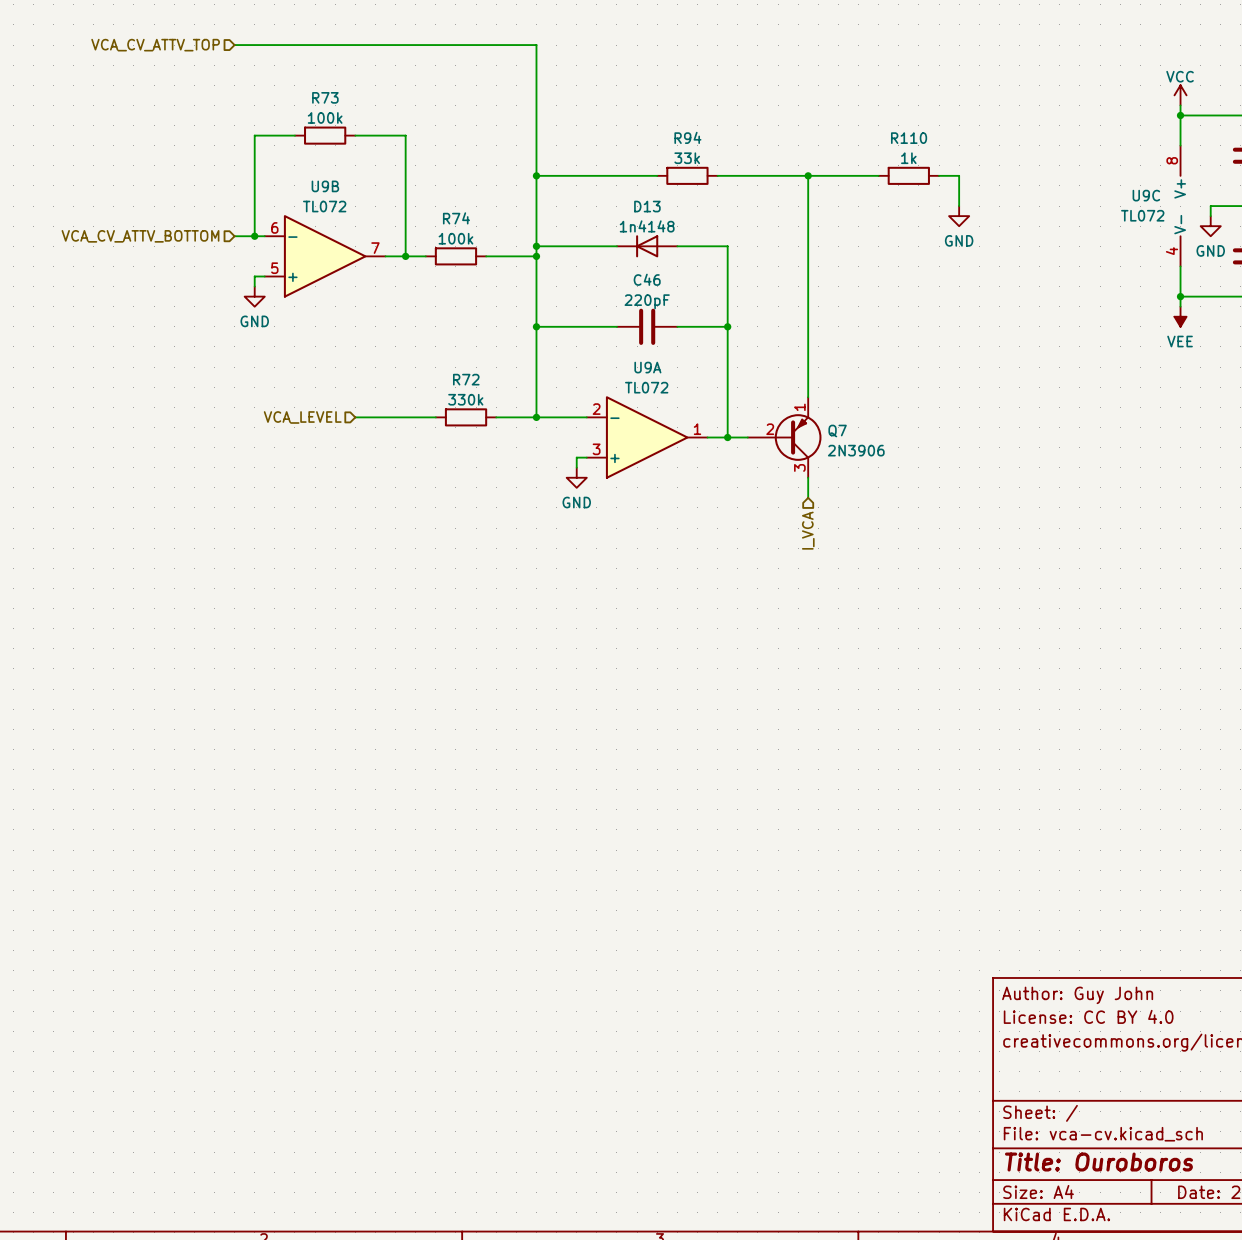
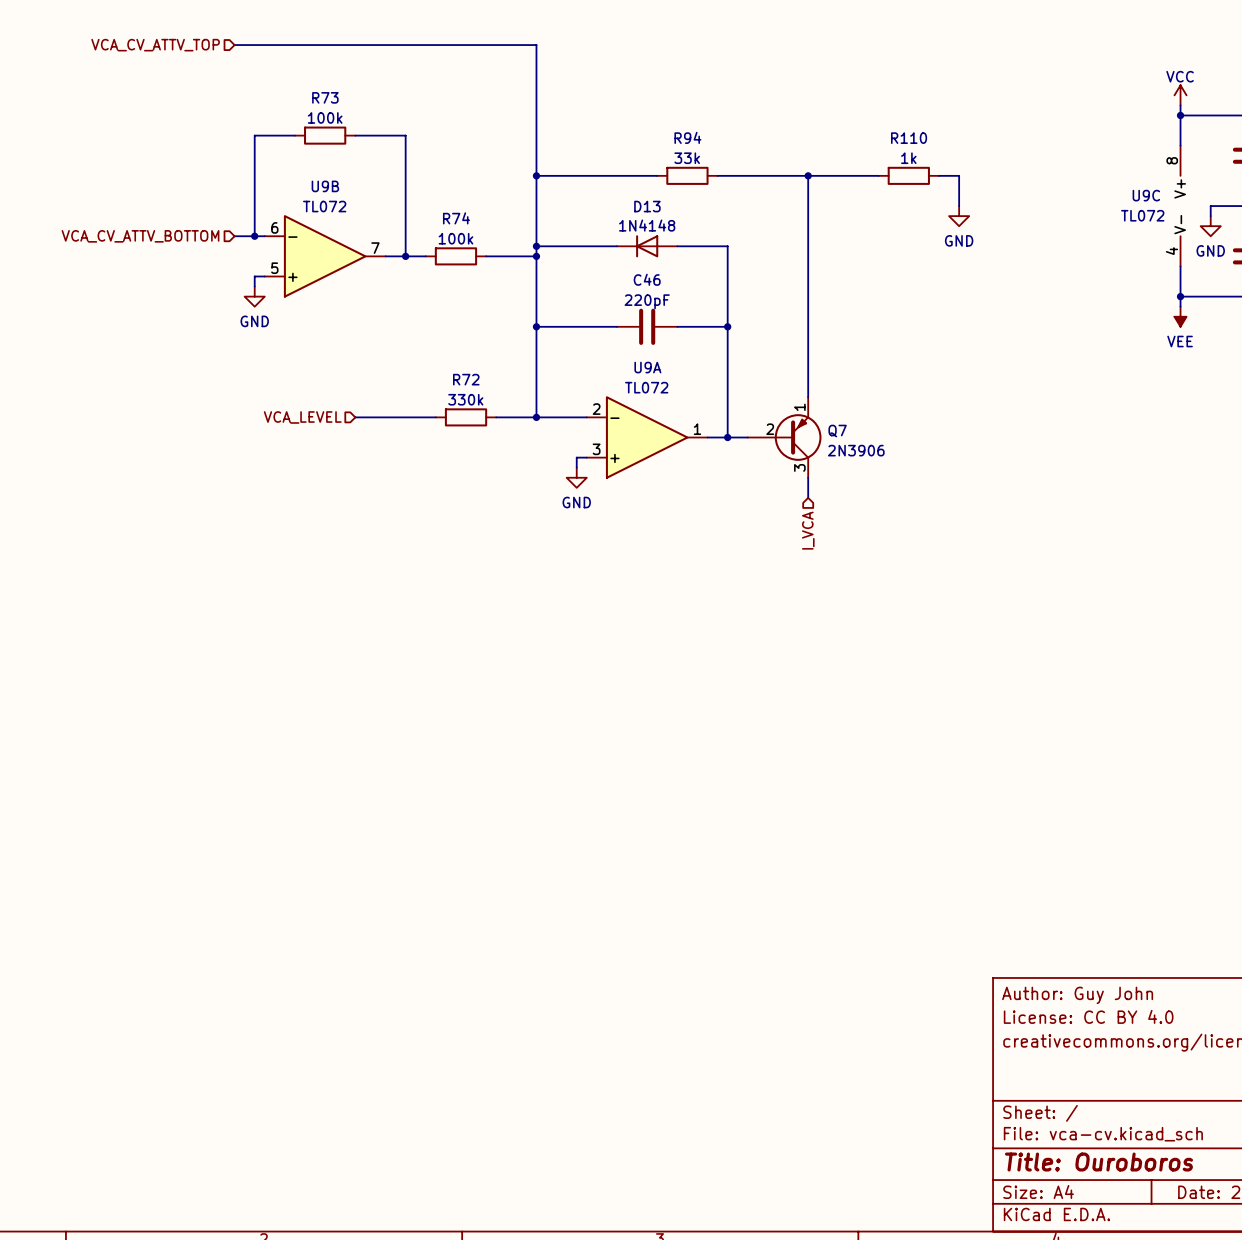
D13 value: 1n4148 (647, 226) -> 1N4148 (647, 225)

